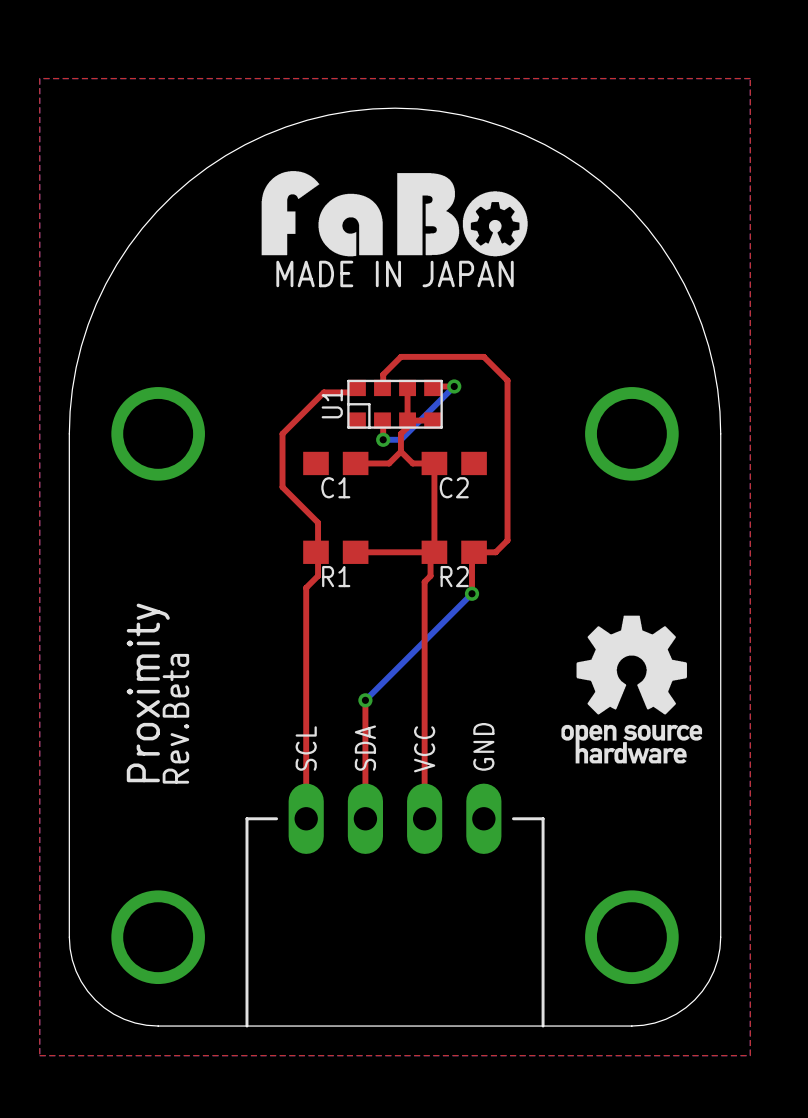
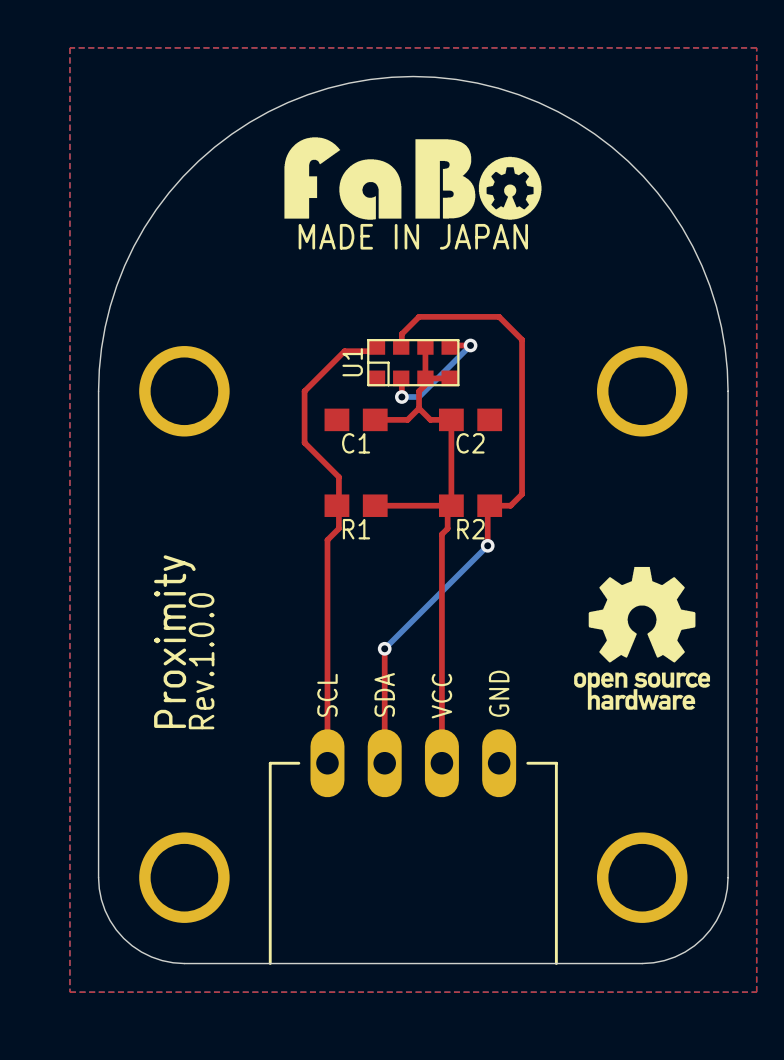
text: Rev.Beta (175, 718) -> Rev.1.0.0 (201, 661)

